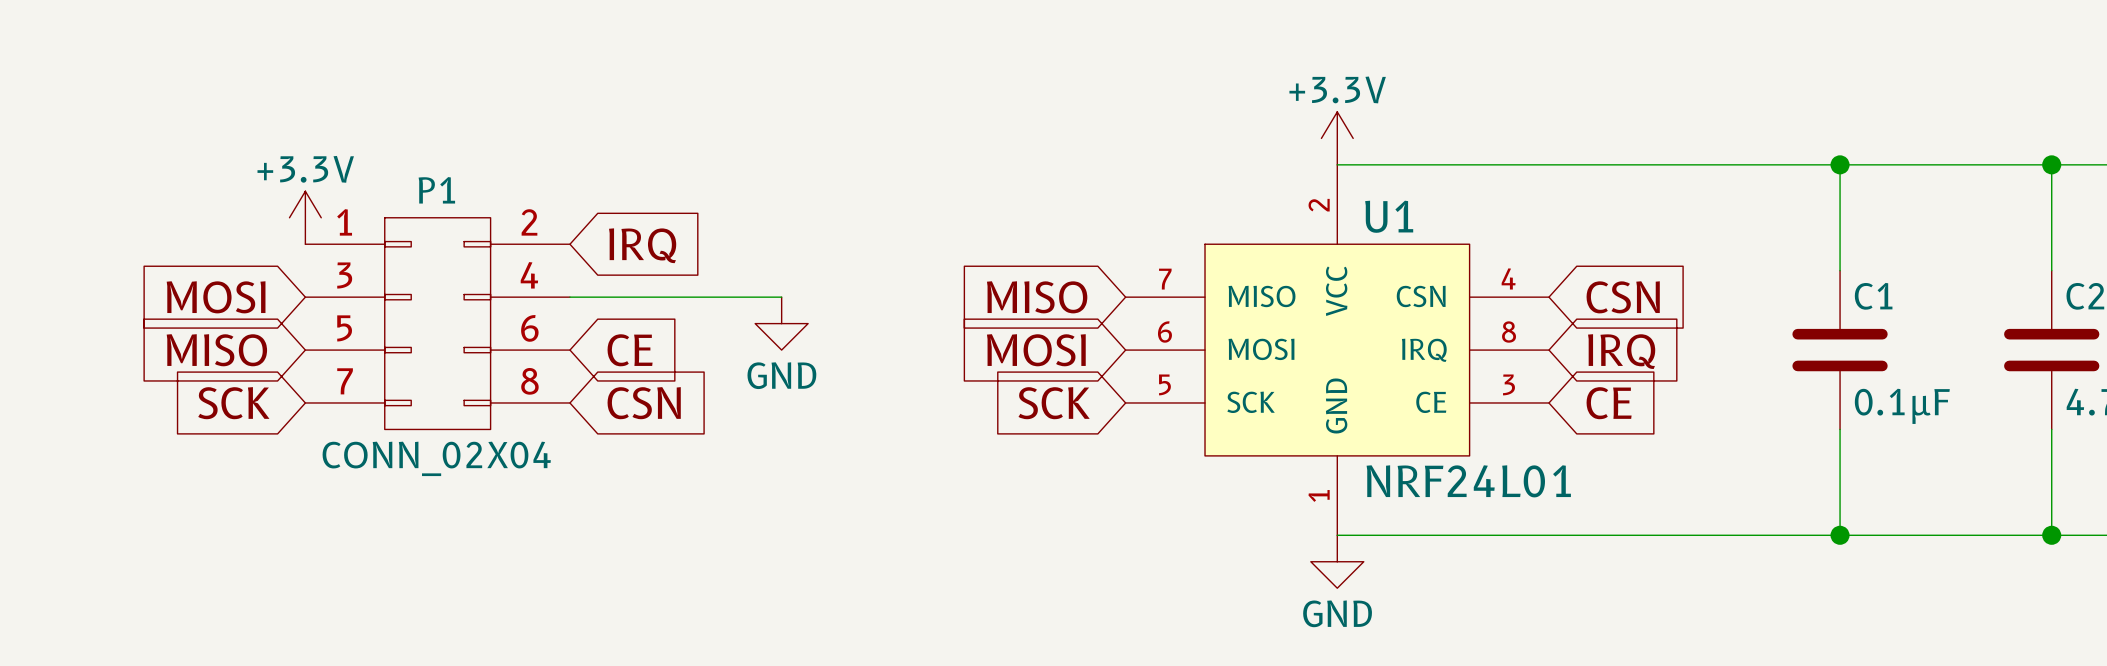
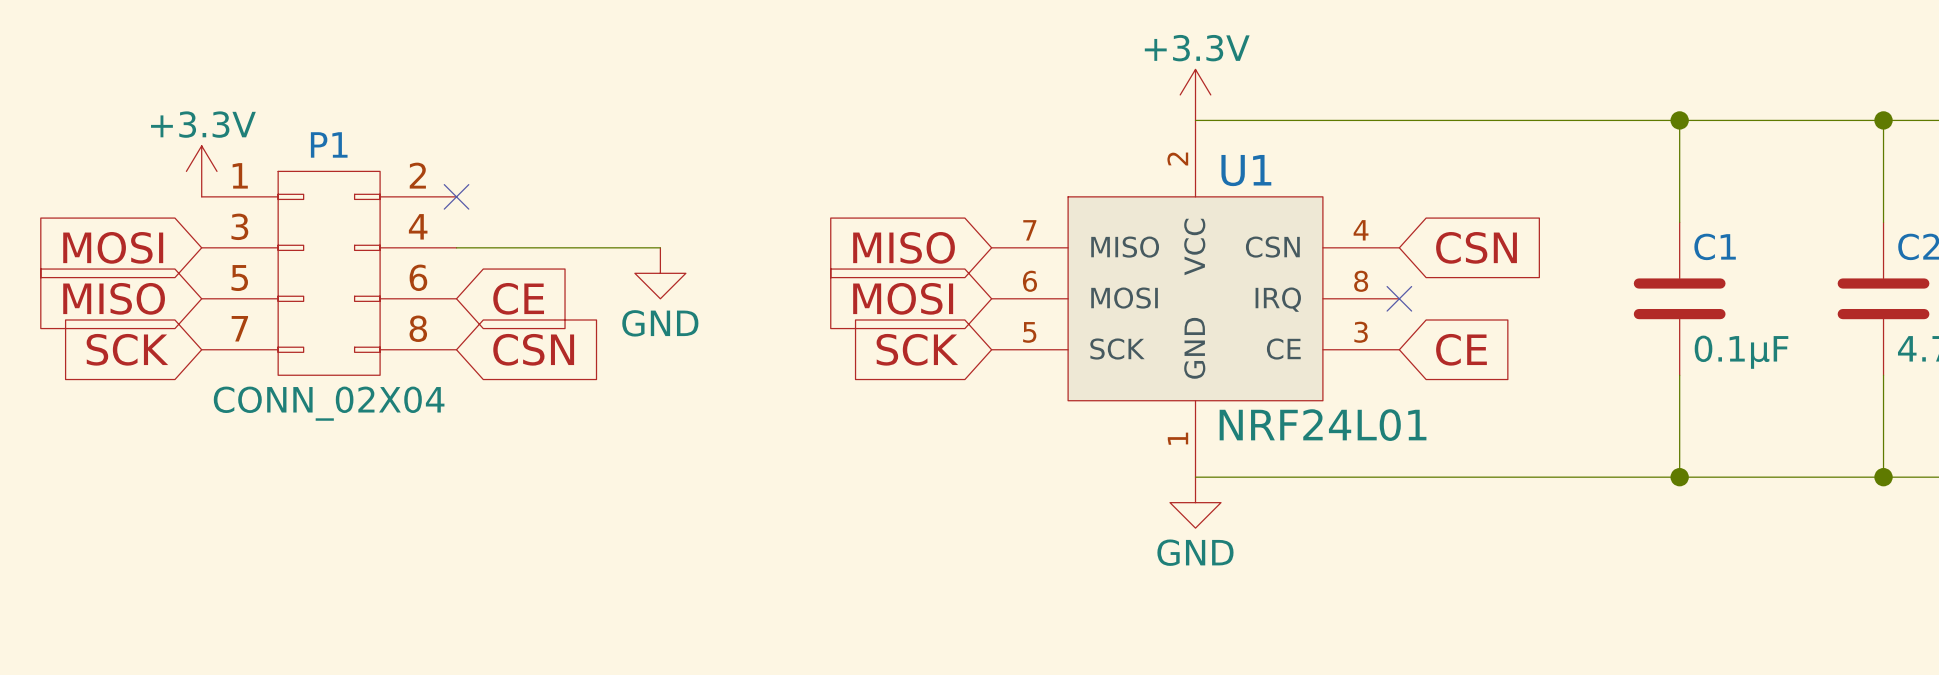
no-connect mark: none -> (456, 196)
global label: IRQ (642, 245) -> none
no-connect mark: none -> (1399, 298)
global label: IRQ (1621, 351) -> none

